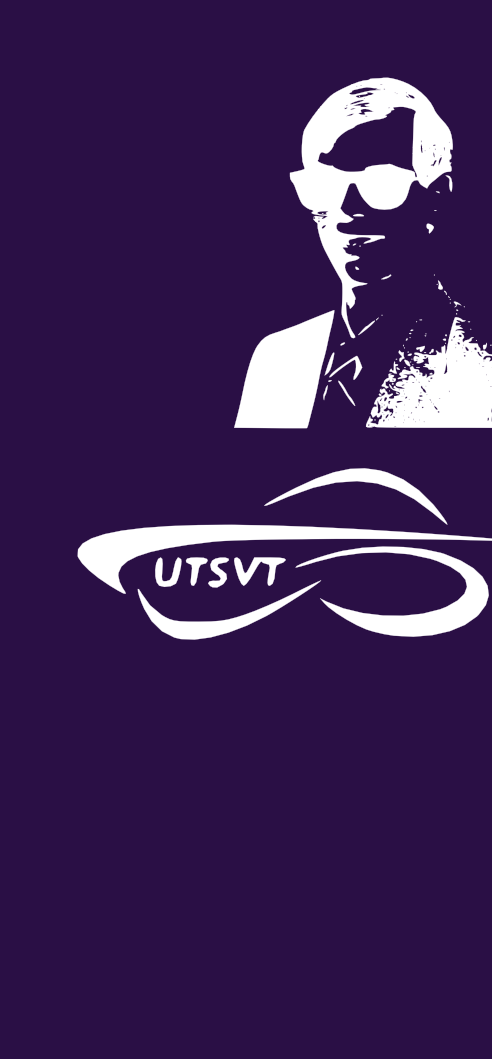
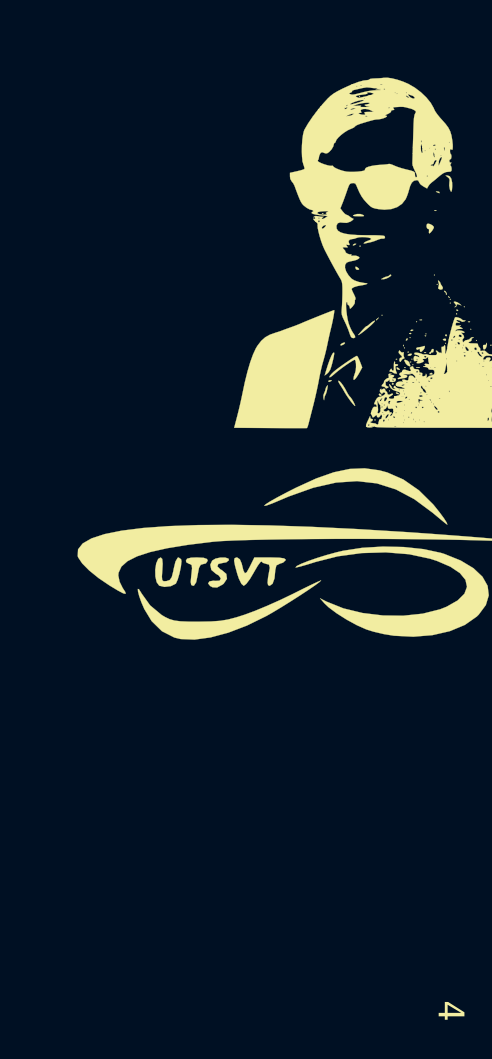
text: none -> 4 (451, 1010)

